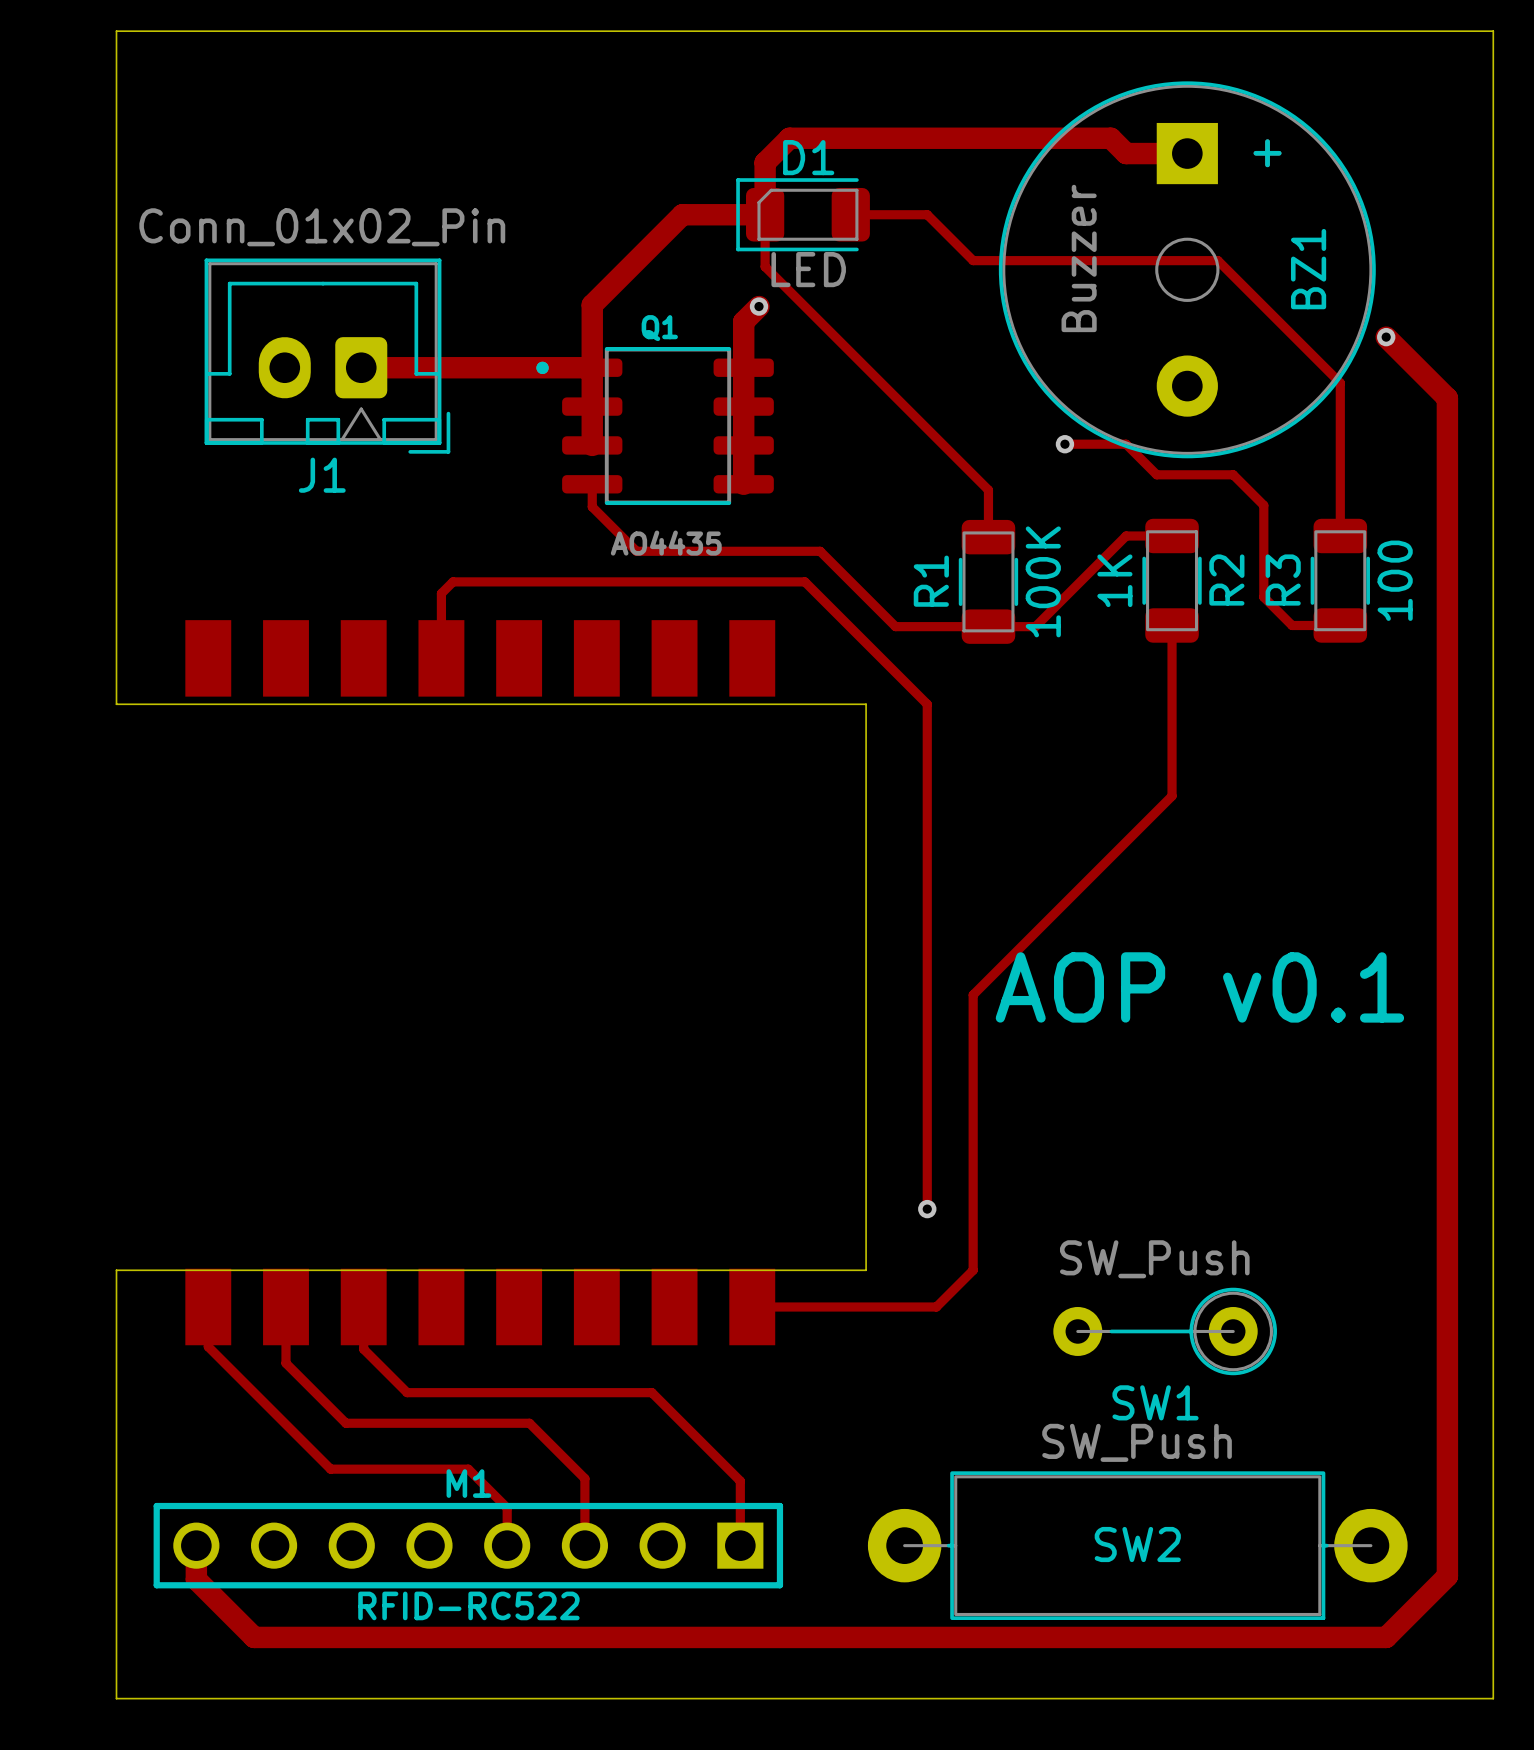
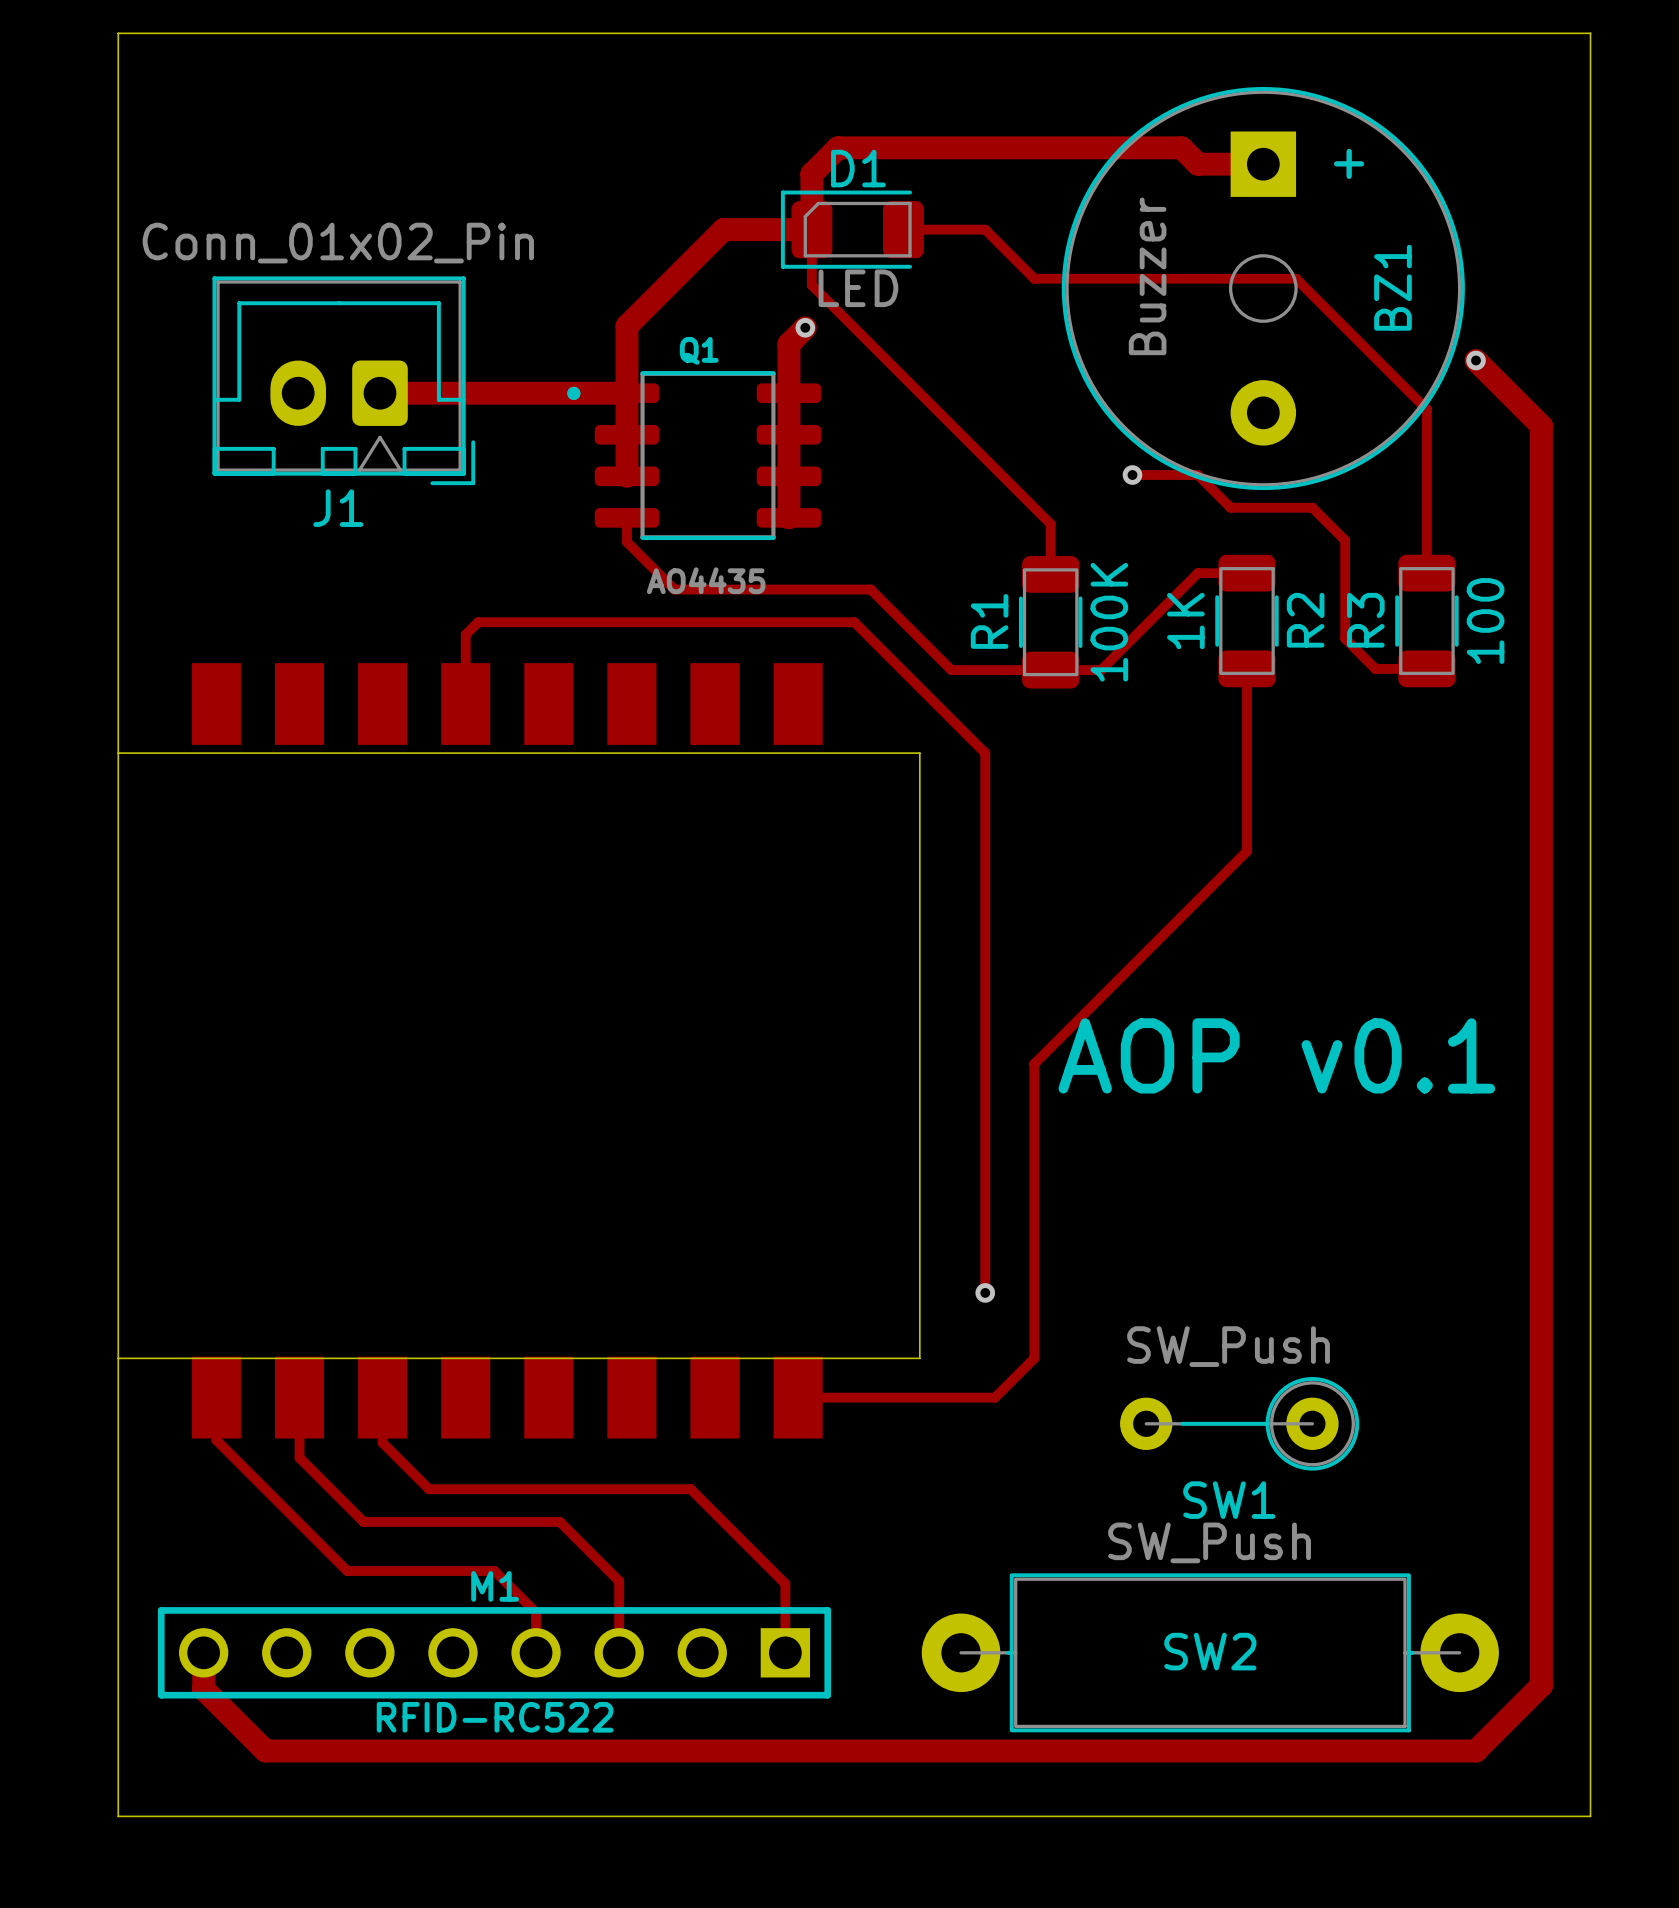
board edge: none -> (118, 753) (118, 1358)

